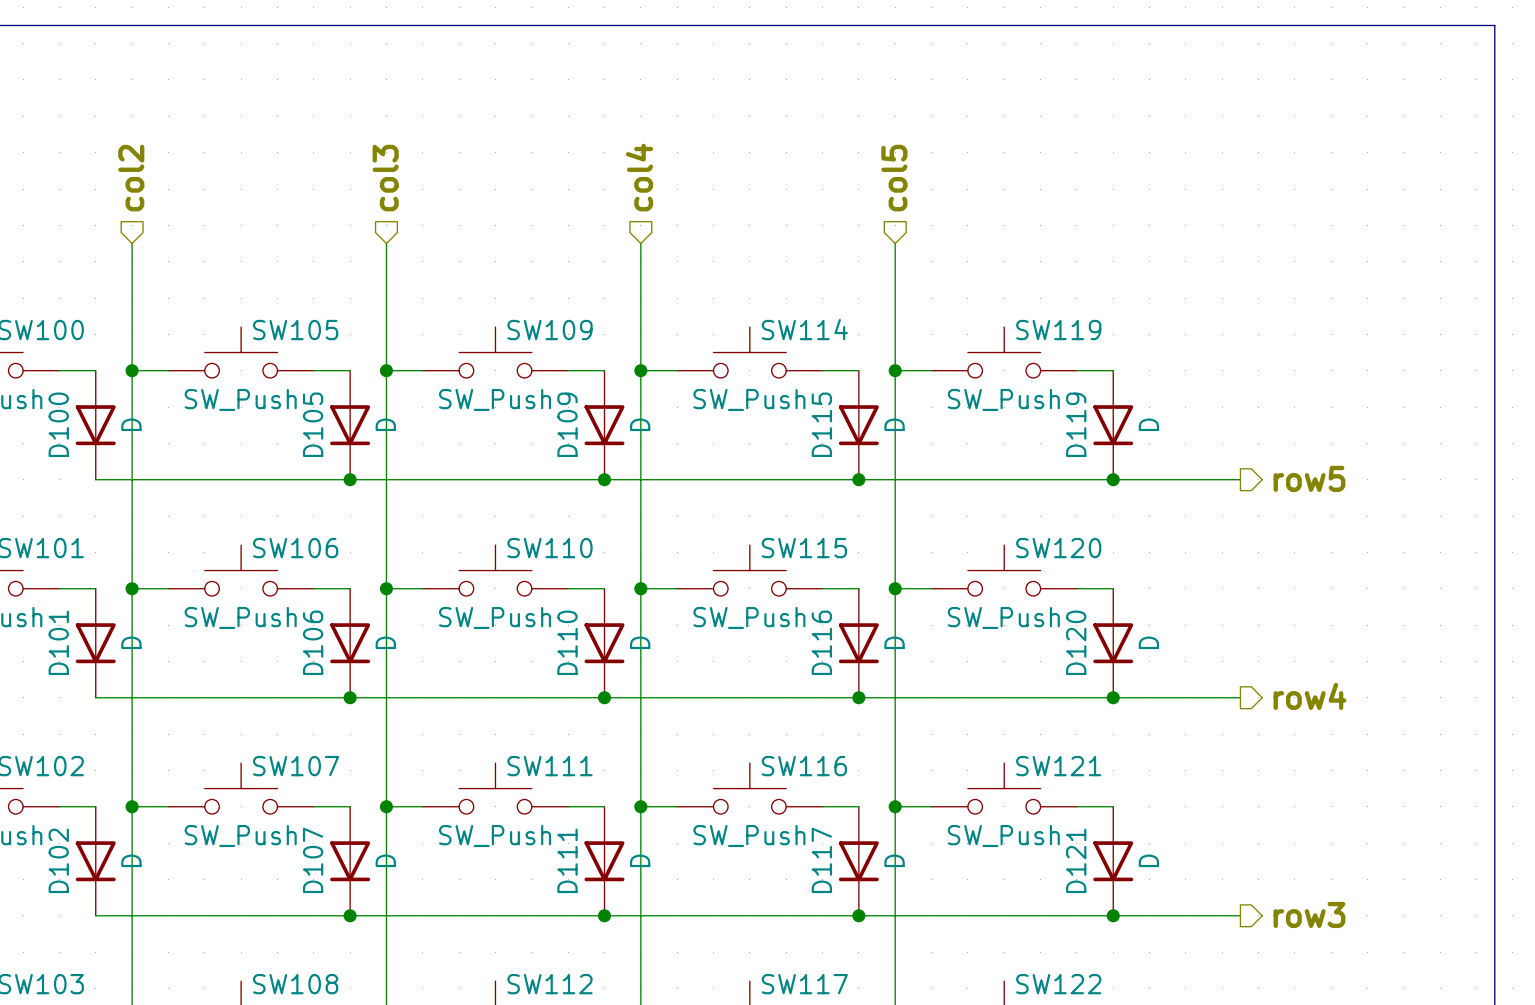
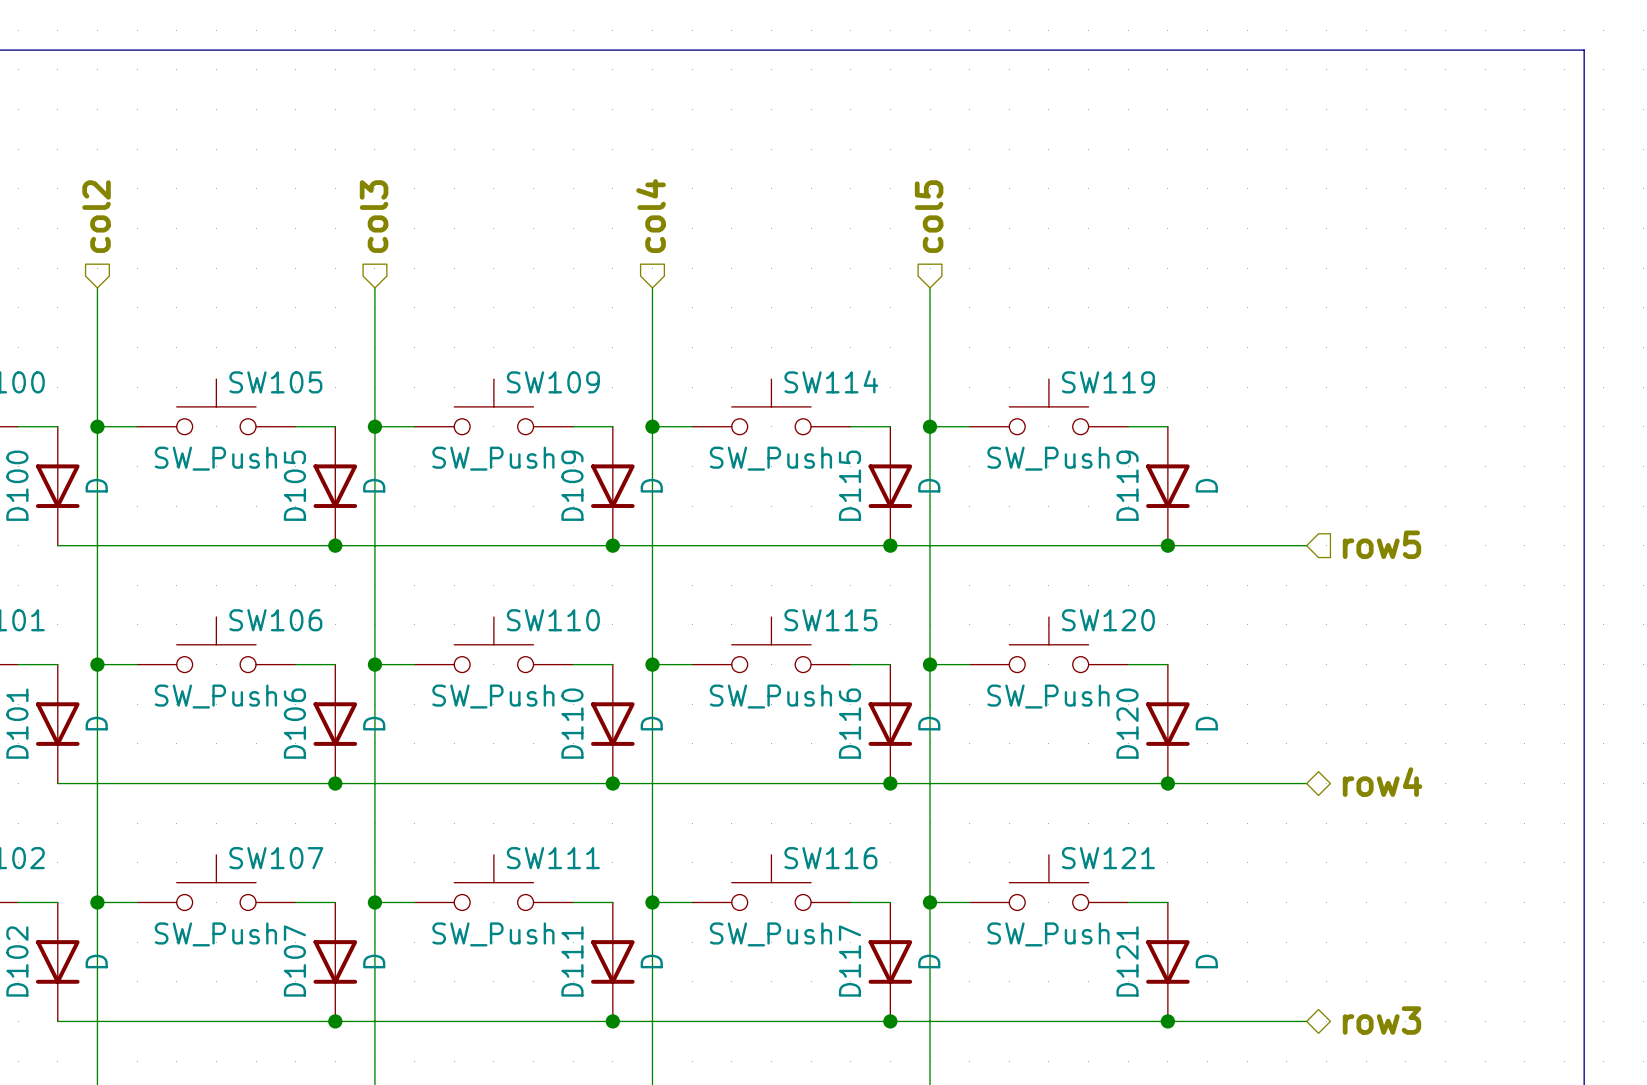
hierarchical label shape: output (1309, 478) -> input (1381, 544)
hierarchical label shape: output (1310, 696) -> bidirectional (1382, 782)
hierarchical label shape: output (1309, 914) -> bidirectional (1381, 1020)

